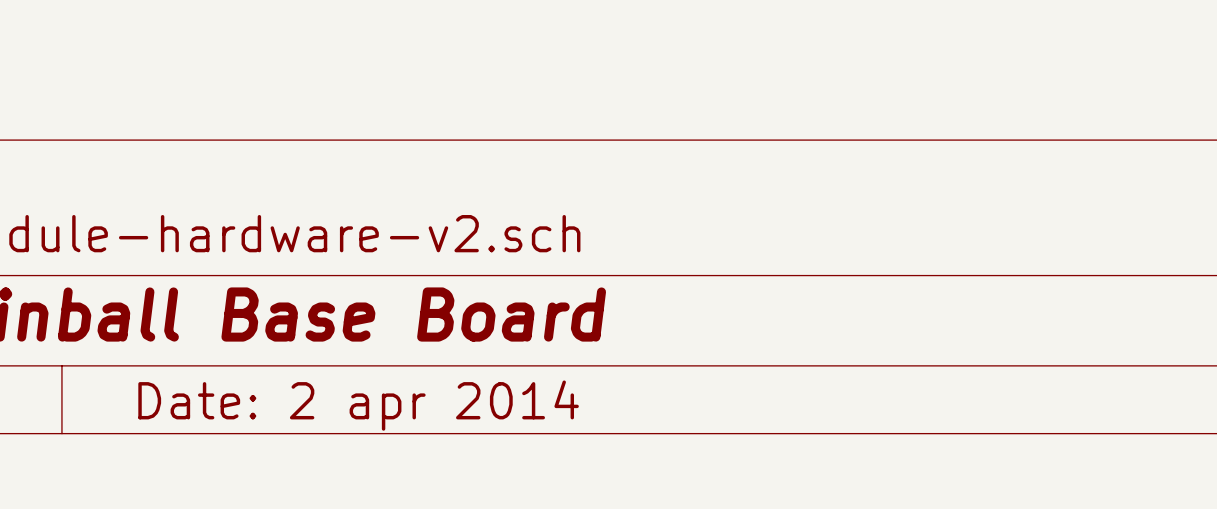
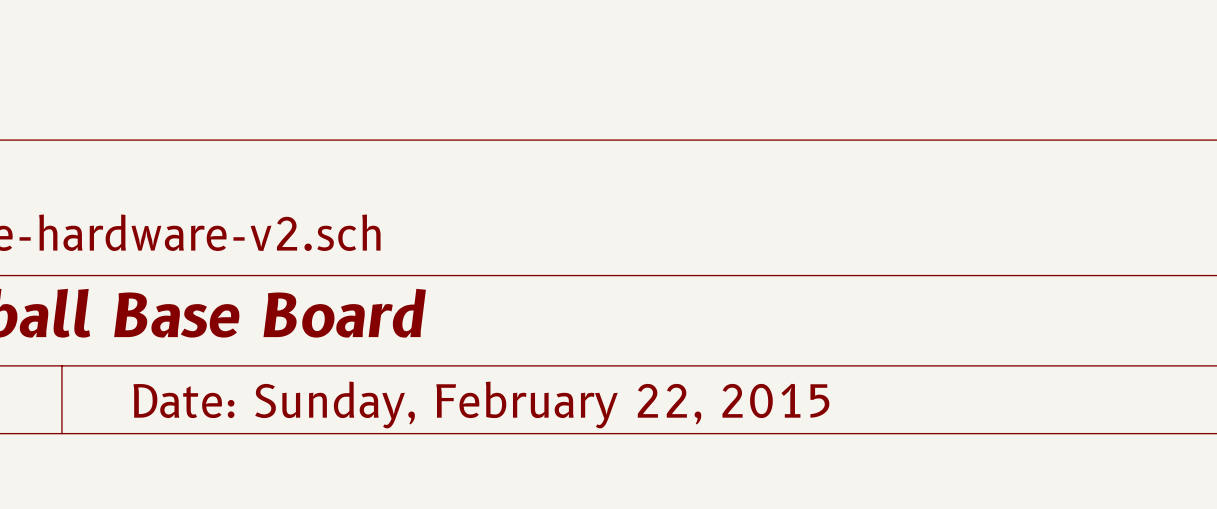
title block: Date: 2 apr 2014 (358, 405) -> Date: Sunday, February 22, 2015 (481, 404)

